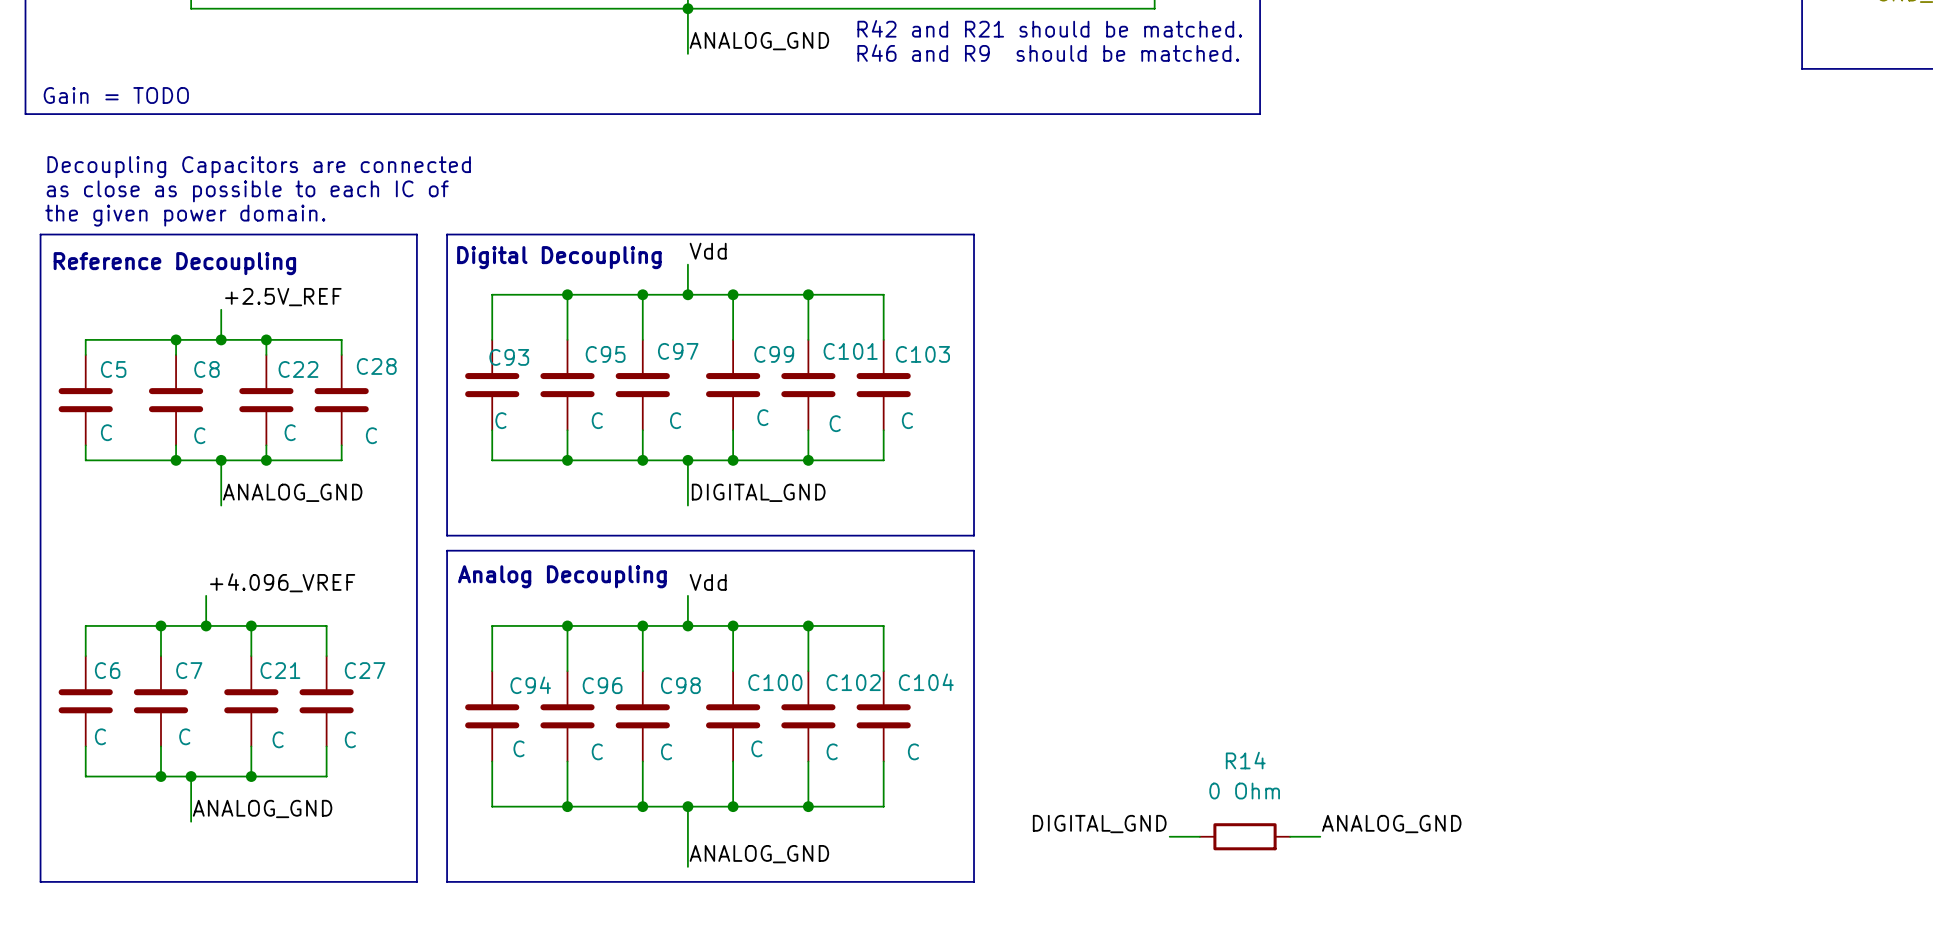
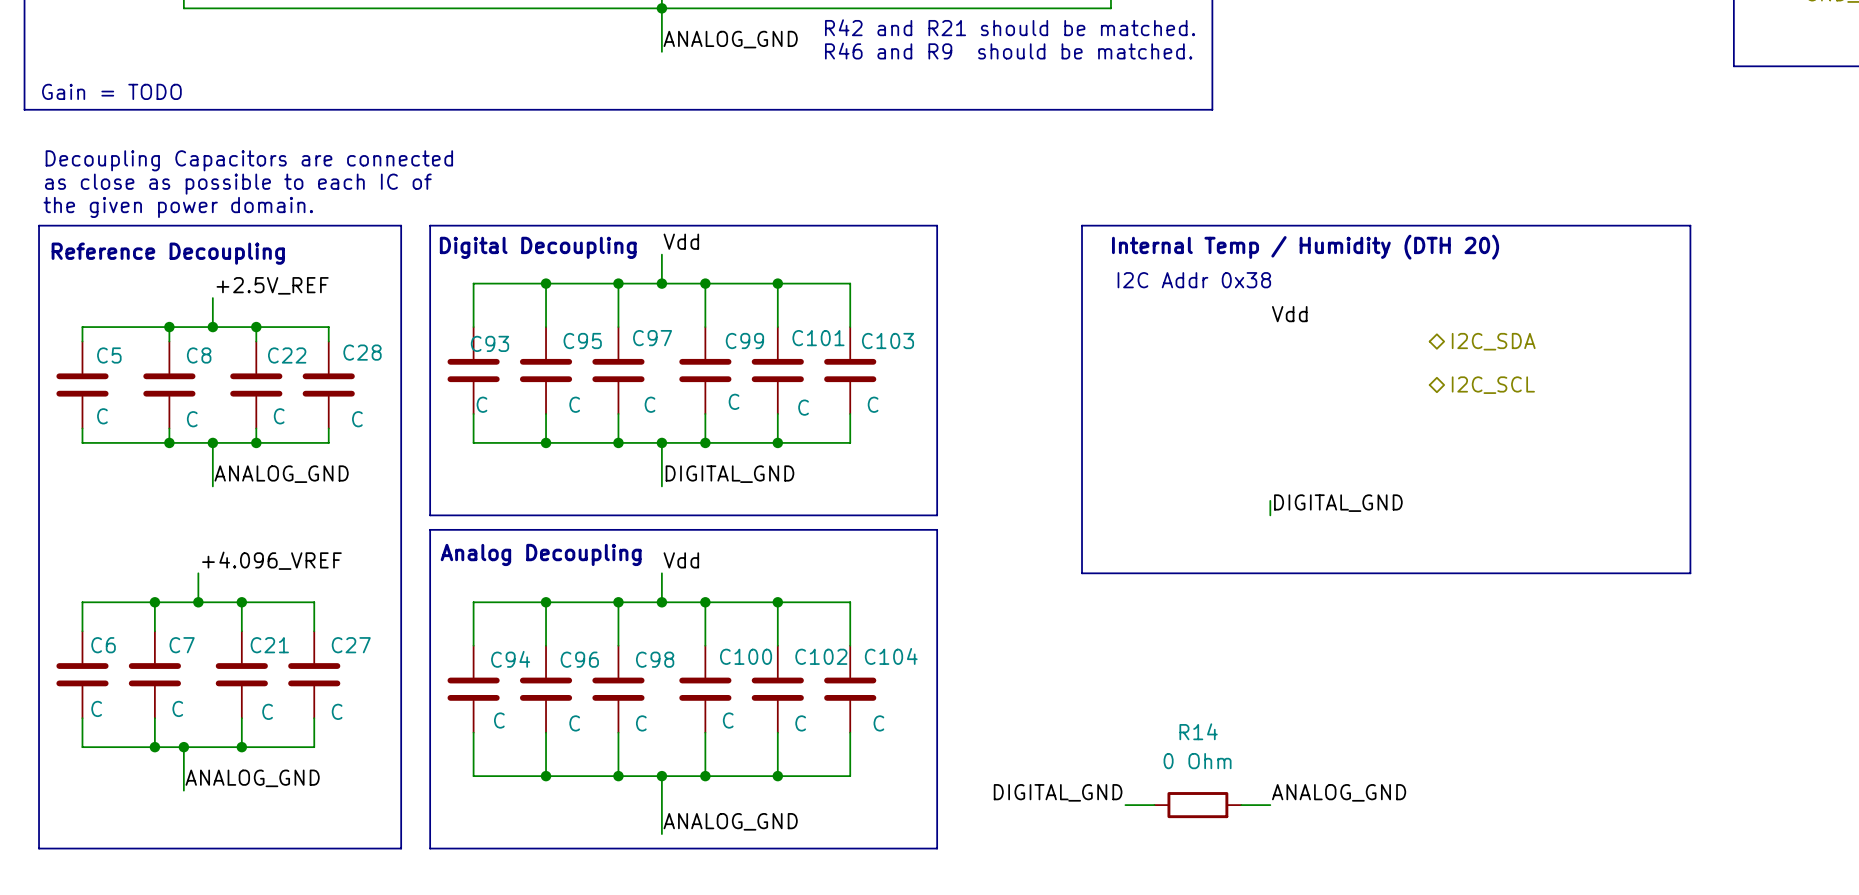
line: none -> (1082, 225) (1690, 225) (1690, 573) (1082, 573) (1082, 225)
text: none -> Internal Temp / Humidity (DTH 20) (1305, 247)
text: none -> I2C Addr 0x38 (1194, 280)
label: none -> Vdd (1289, 314)
hierarchical label: none -> I2C_SDA (1493, 341)
hierarchical label: none -> I2C_SCL (1493, 385)
wire: none -> (1270, 500) (1270, 515)
label: none -> DIGITAL_GND (1338, 503)

